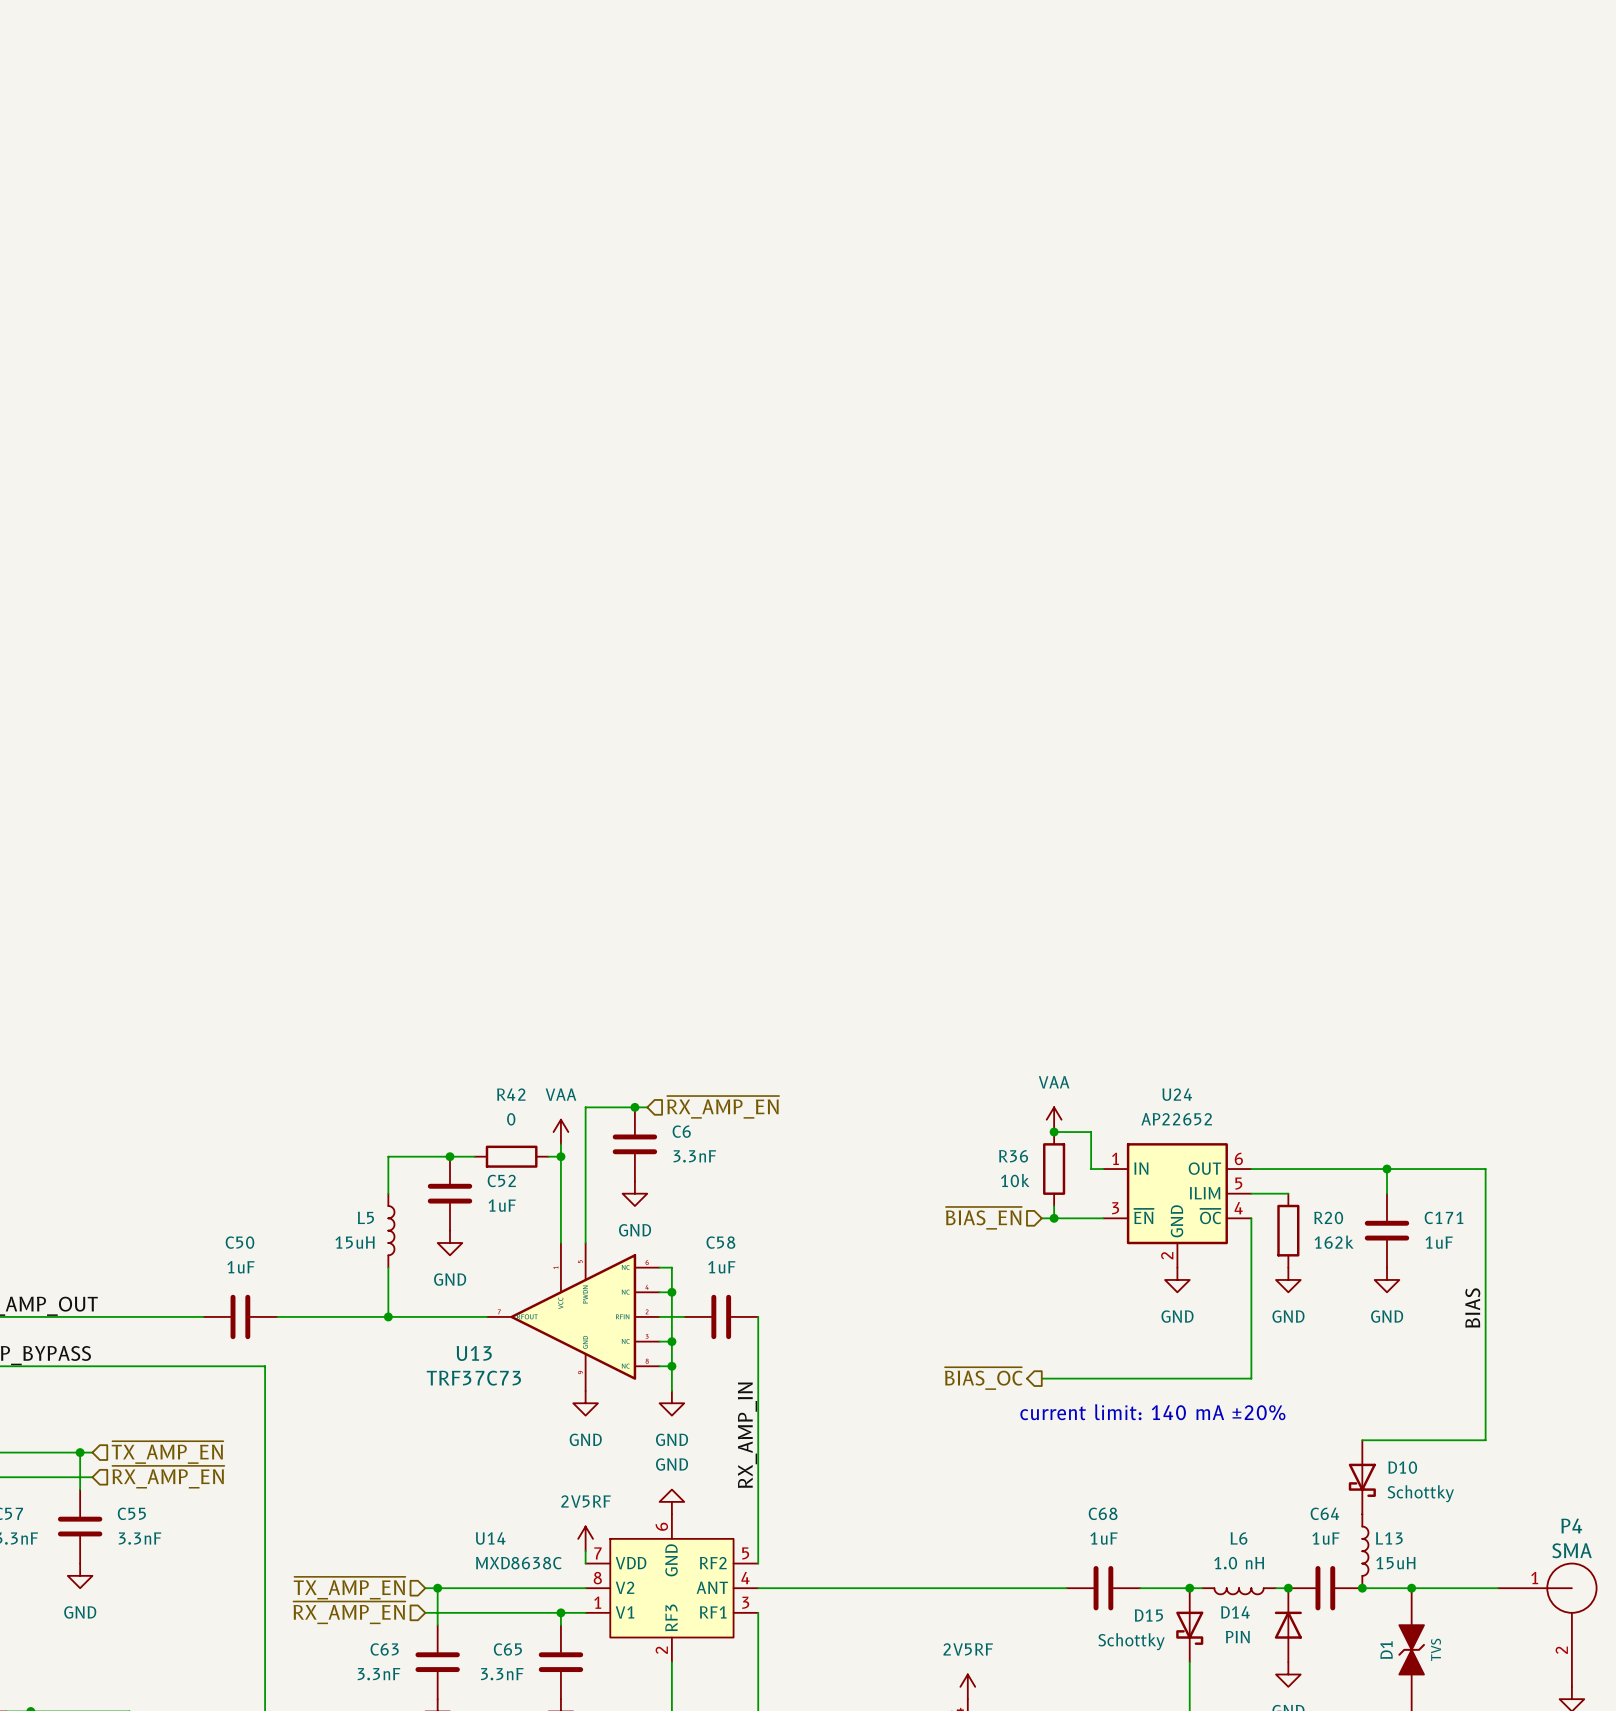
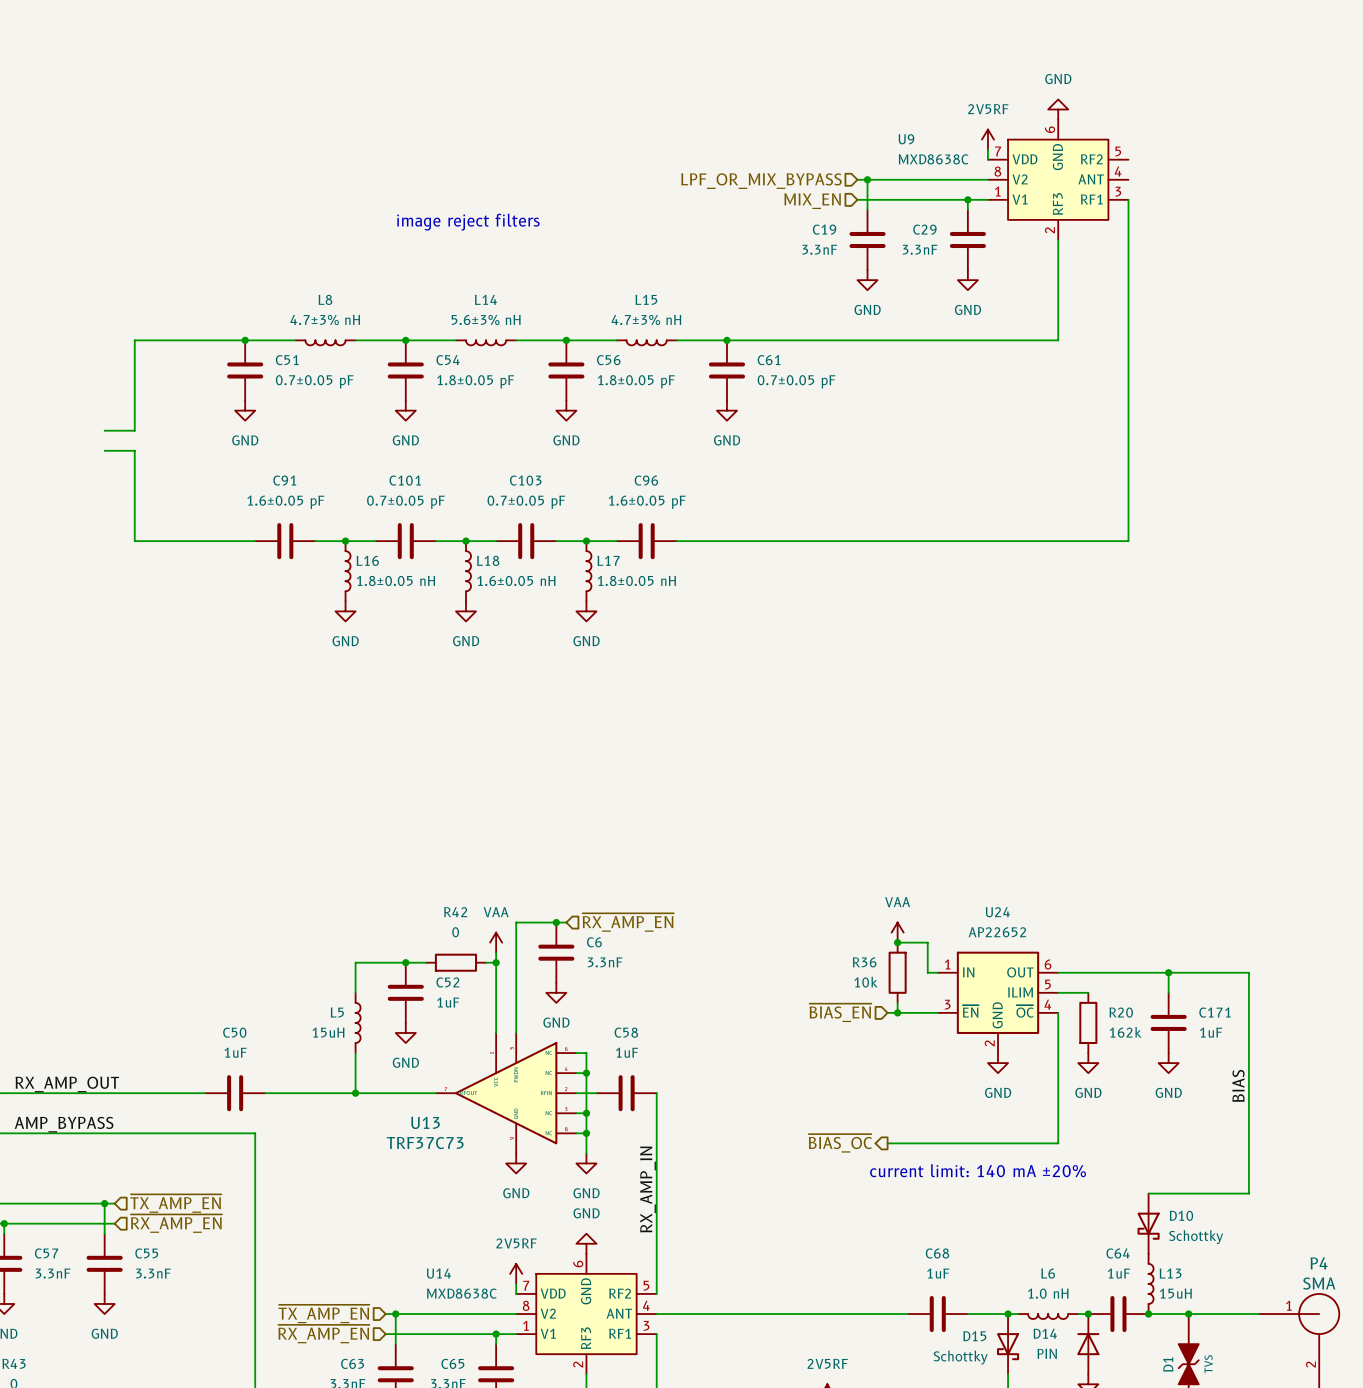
power symbol: none -> GND (1058, 109)
power symbol: none -> 2V5RF (987, 139)
wire: none -> (987, 149) (987, 159)
wire: none -> (857, 179) (987, 179)
wire: none -> (867, 179) (867, 209)
junction: none -> (867, 179)
U9: none -> MXD8638C (1058, 179)
hierarchical label: none -> LPF_OR_MIX_BYPASS (761, 181)
wire: none -> (857, 199) (987, 199)
wire: none -> (967, 199) (967, 209)
junction: none -> (967, 199)
wire: none -> (1128, 199) (1128, 541) (676, 541)
hierarchical label: none -> MIX_EN (812, 201)
text: none -> image reject filters (468, 222)
C19: none -> 3.3nF (867, 239)
C29: none -> 3.3nF (967, 239)
wire: none -> (1058, 239) (1058, 340) (676, 340)
power symbol: none -> GND (867, 280)
power symbol: none -> GND (967, 280)
junction: none -> (245, 340)
wire: none -> (295, 340) (134, 340) (134, 430) (104, 430)
wire: none -> (355, 340) (455, 340)
junction: none -> (405, 340)
wire: none -> (516, 340) (616, 340)
junction: none -> (566, 340)
junction: none -> (726, 340)
L8: none -> 4.7±3% nH (325, 342)
L14: none -> 5.6±3% nH (486, 342)
L15: none -> 4.7±3% nH (646, 342)
C51: none -> 0.7±0.05 pF (245, 370)
C54: none -> 1.8±0.05 pF (405, 370)
C56: none -> 1.8±0.05 pF (566, 370)
C61: none -> 0.7±0.05 pF (726, 370)
power symbol: none -> GND (245, 410)
power symbol: none -> GND (405, 410)
power symbol: none -> GND (566, 410)
power symbol: none -> GND (726, 410)
wire: none -> (104, 450) (134, 450) (134, 541) (255, 541)
C91: none -> 1.6±0.05 pF (285, 541)
wire: none -> (315, 541) (375, 541)
junction: none -> (345, 541)
C101: none -> 0.7±0.05 pF (405, 541)
wire: none -> (435, 541) (496, 541)
junction: none -> (466, 541)
C103: none -> 0.7±0.05 pF (526, 541)
wire: none -> (556, 541) (616, 541)
junction: none -> (586, 541)
C96: none -> 1.6±0.05 pF (646, 541)
L16: none -> 1.8±0.05 nH (348, 571)
L18: none -> 1.6±0.05 nH (468, 571)
L17: none -> 1.8±0.05 nH (588, 571)
power symbol: none -> GND (345, 611)
power symbol: none -> GND (466, 611)
power symbol: none -> GND (586, 611)

